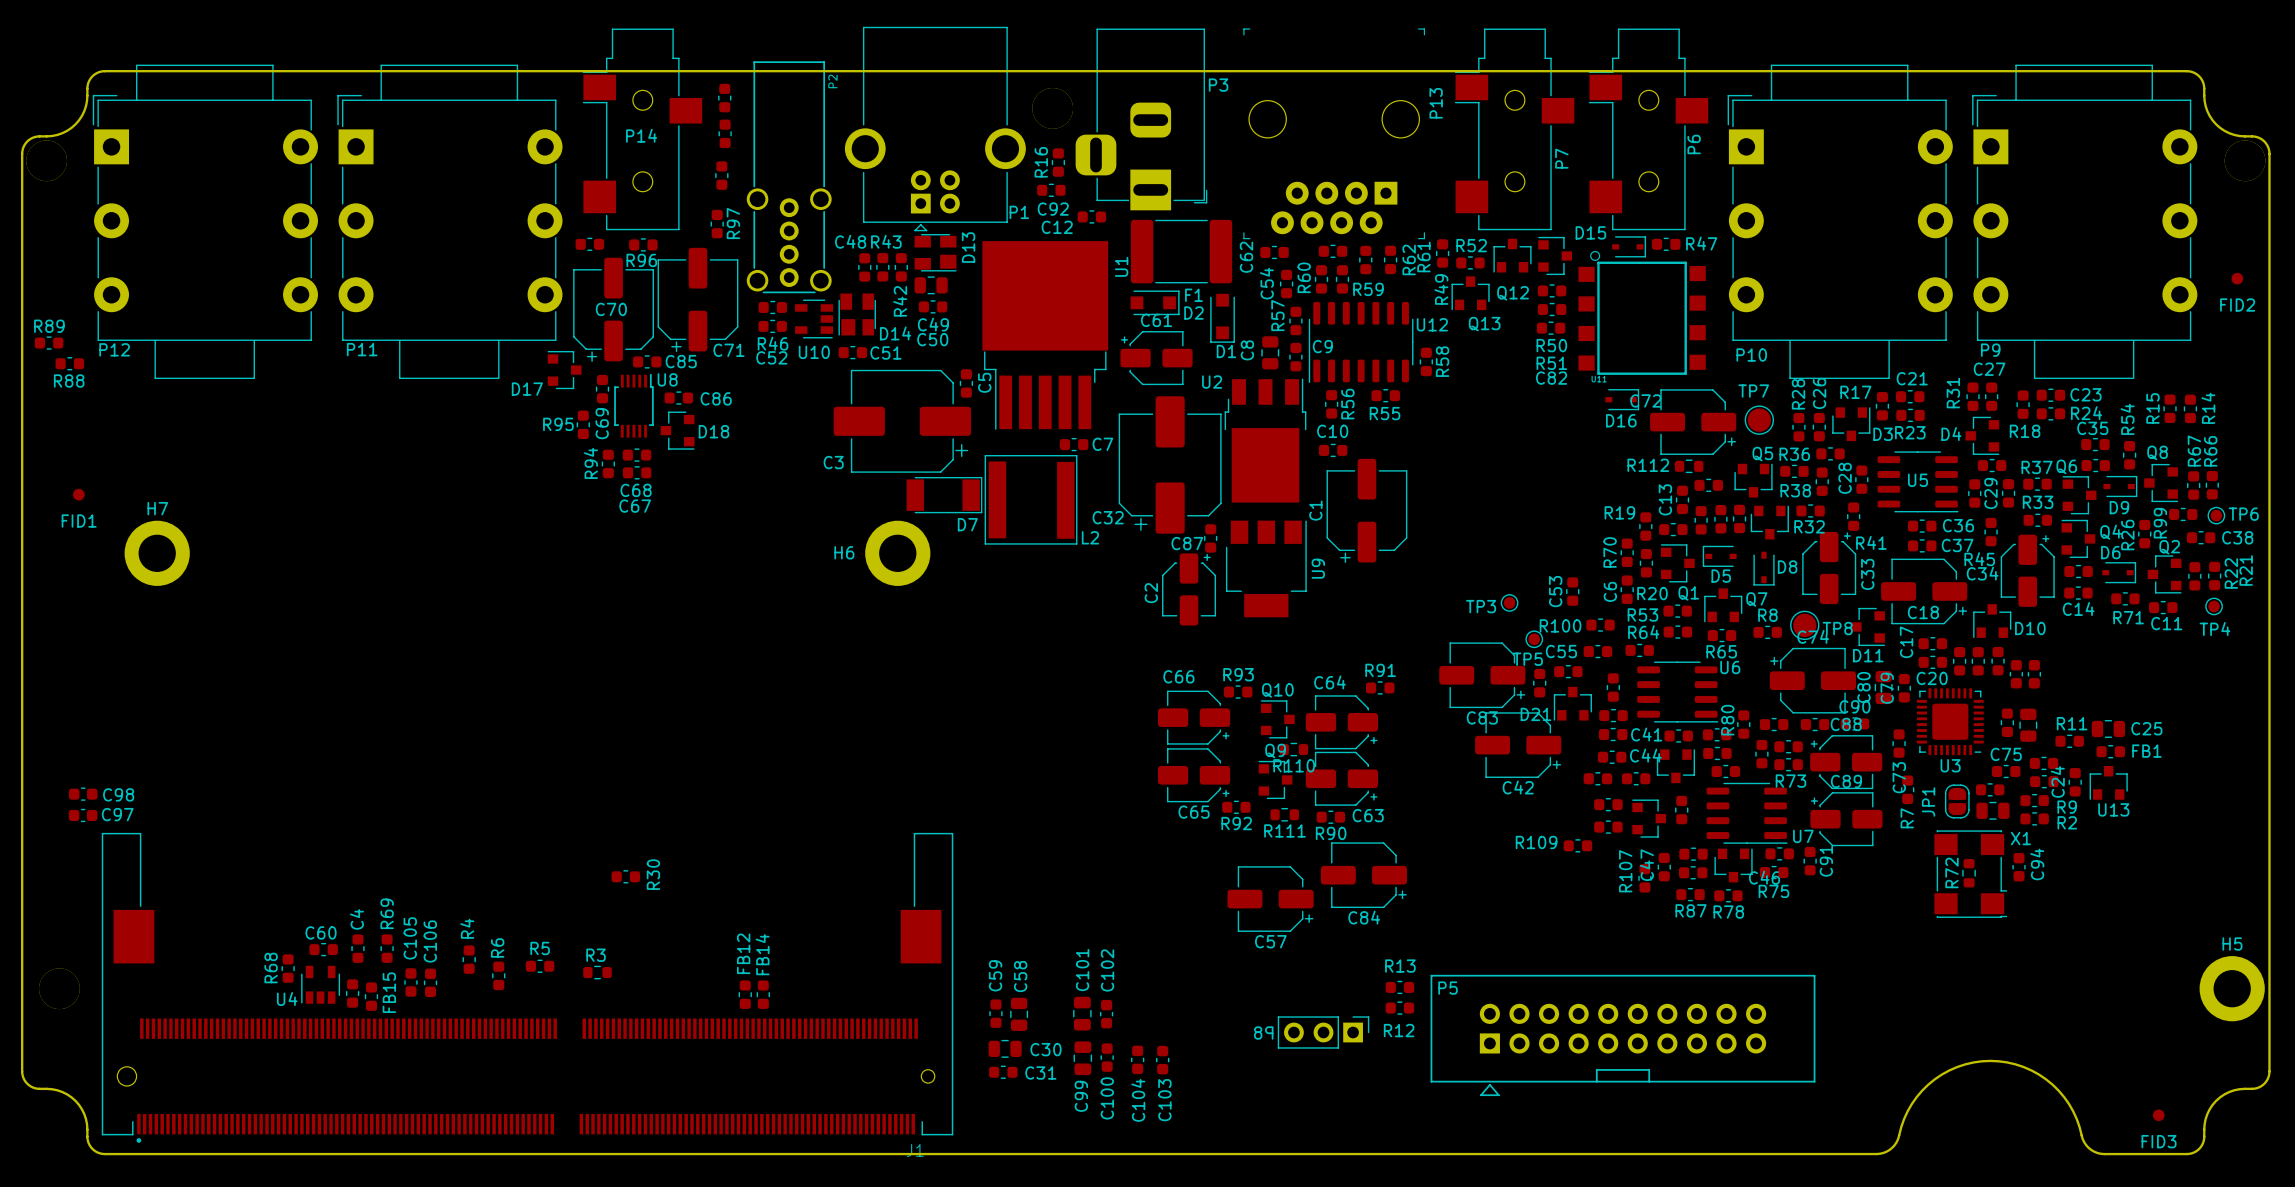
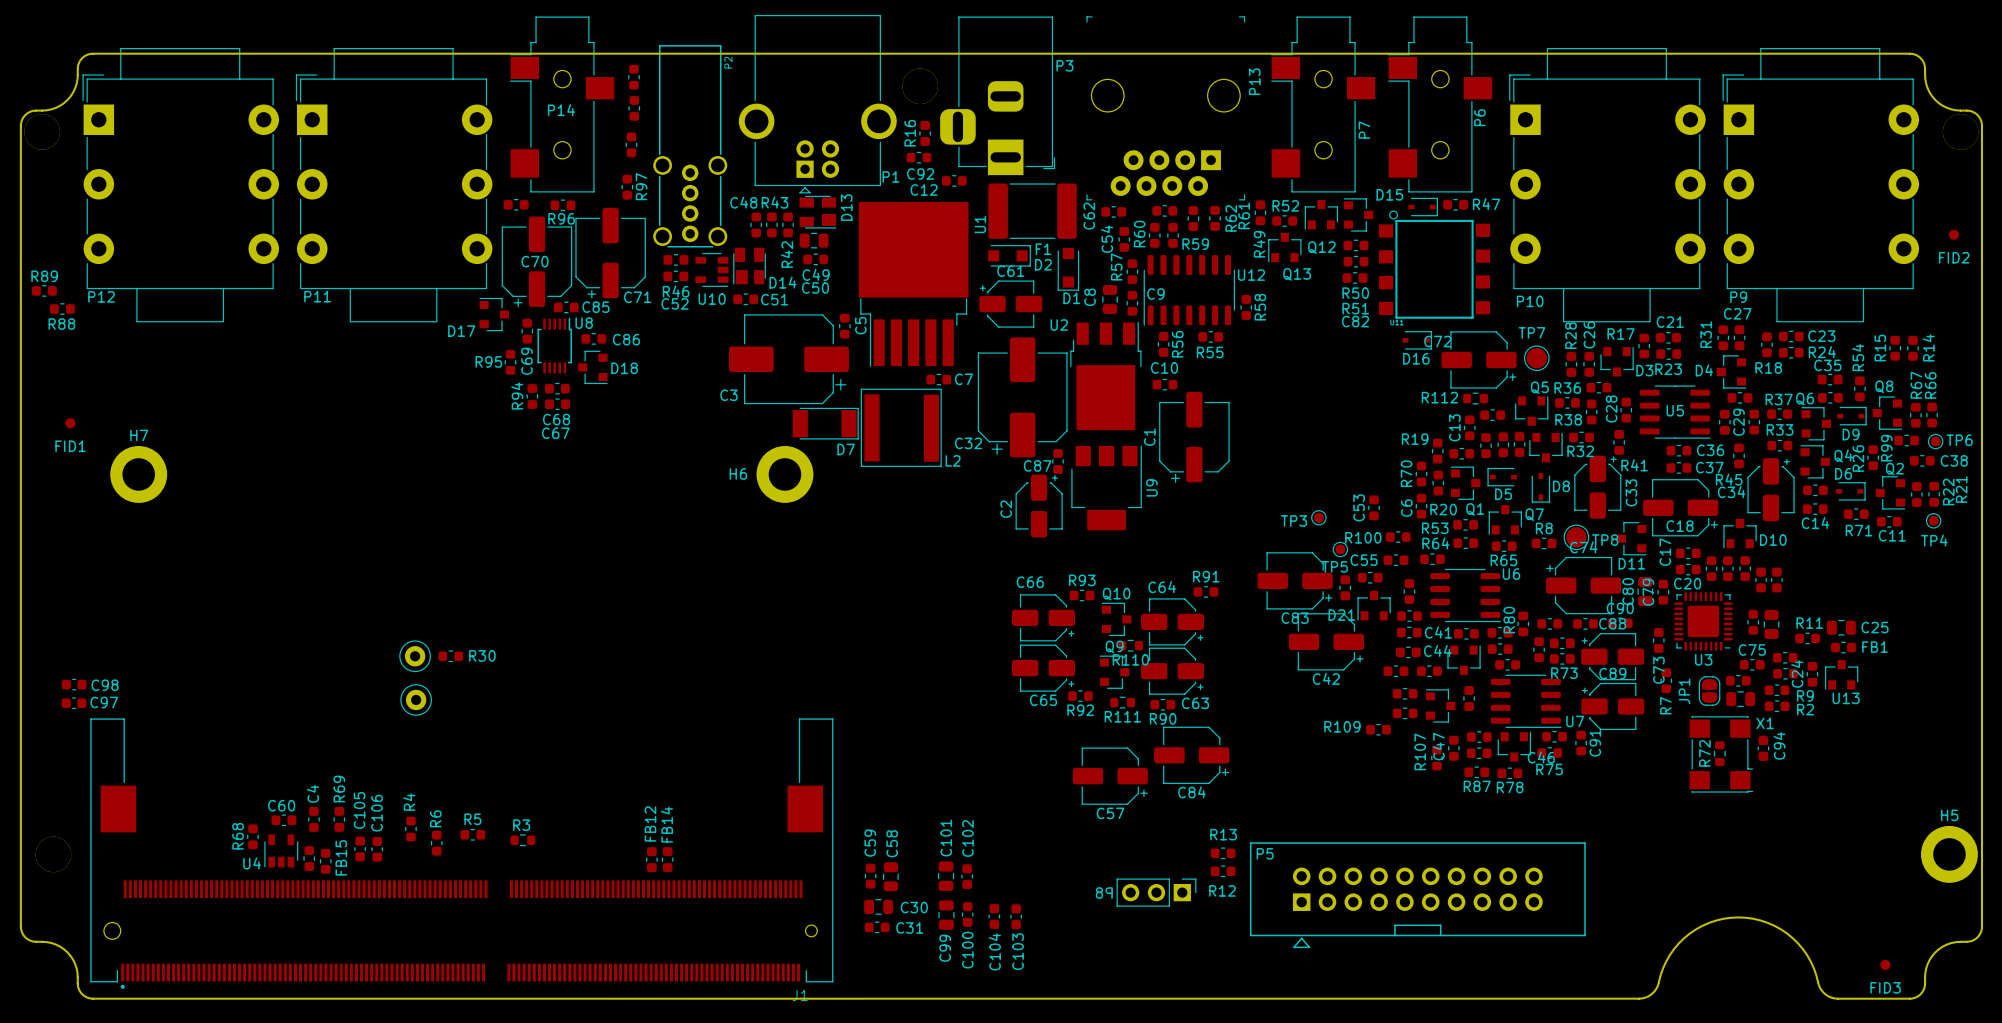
part: none -> (415, 656)
part: none -> (416, 699)
R30 name rotation: 0° (653, 874) -> 90° clockwise (482, 655)
R30 position: (625, 876) -> (450, 656)

